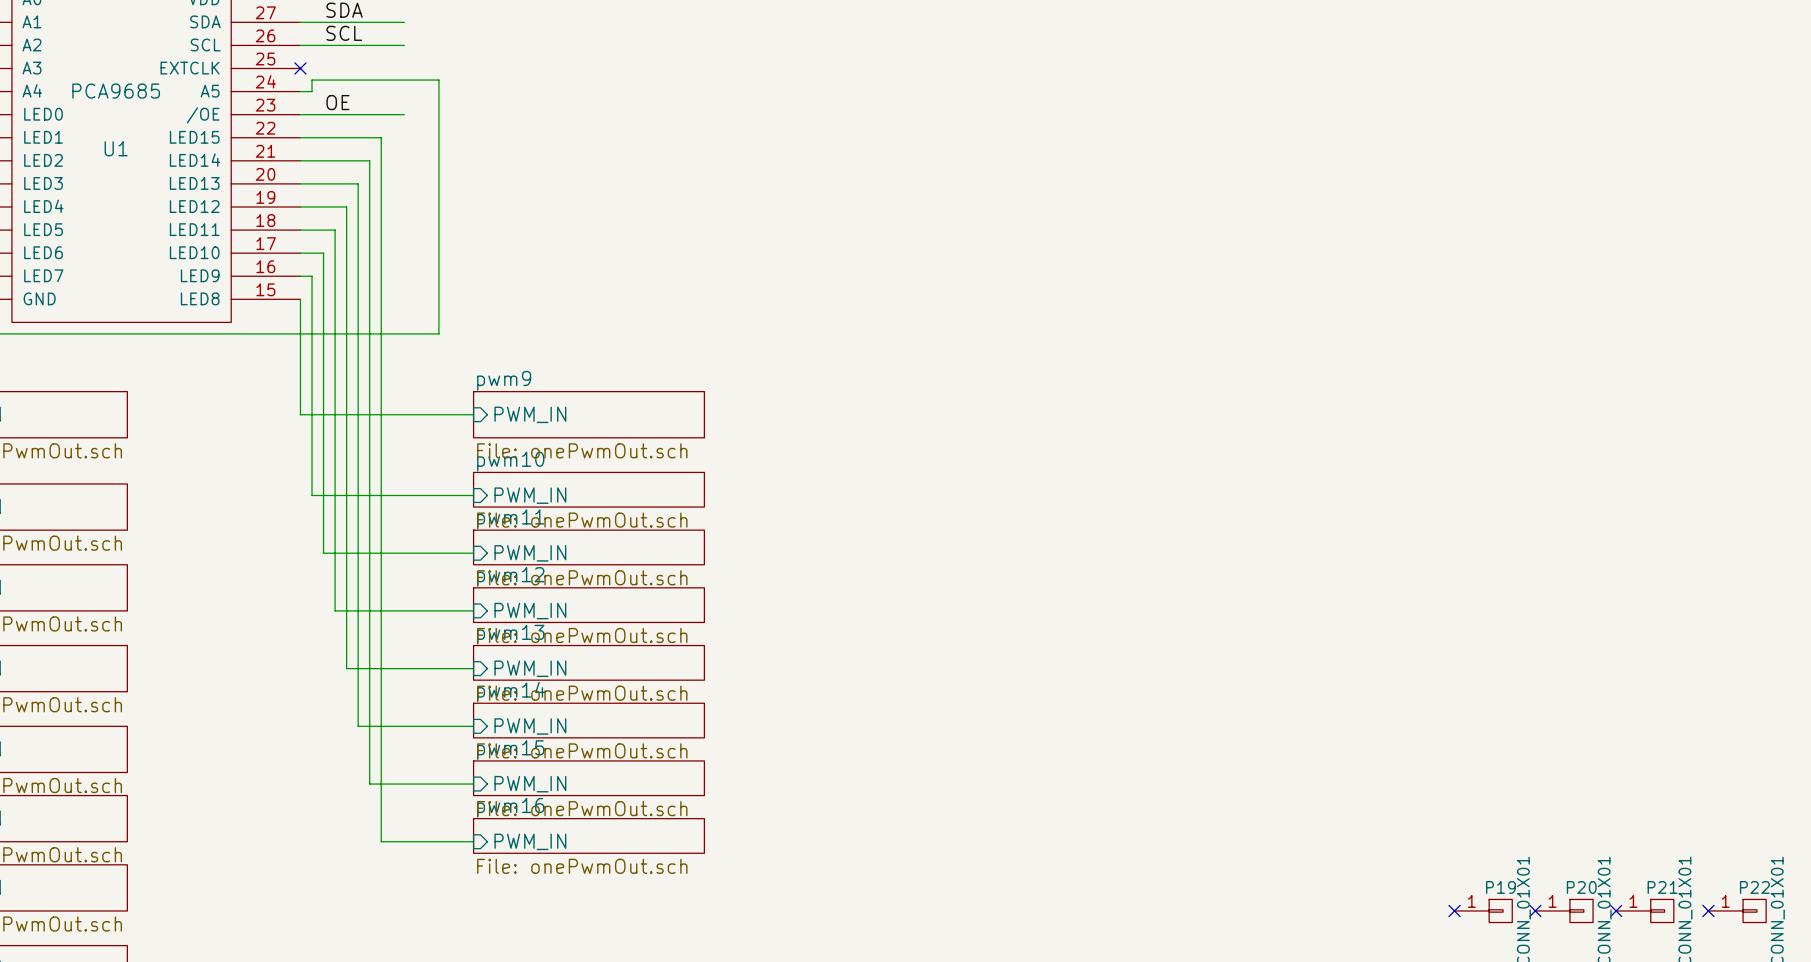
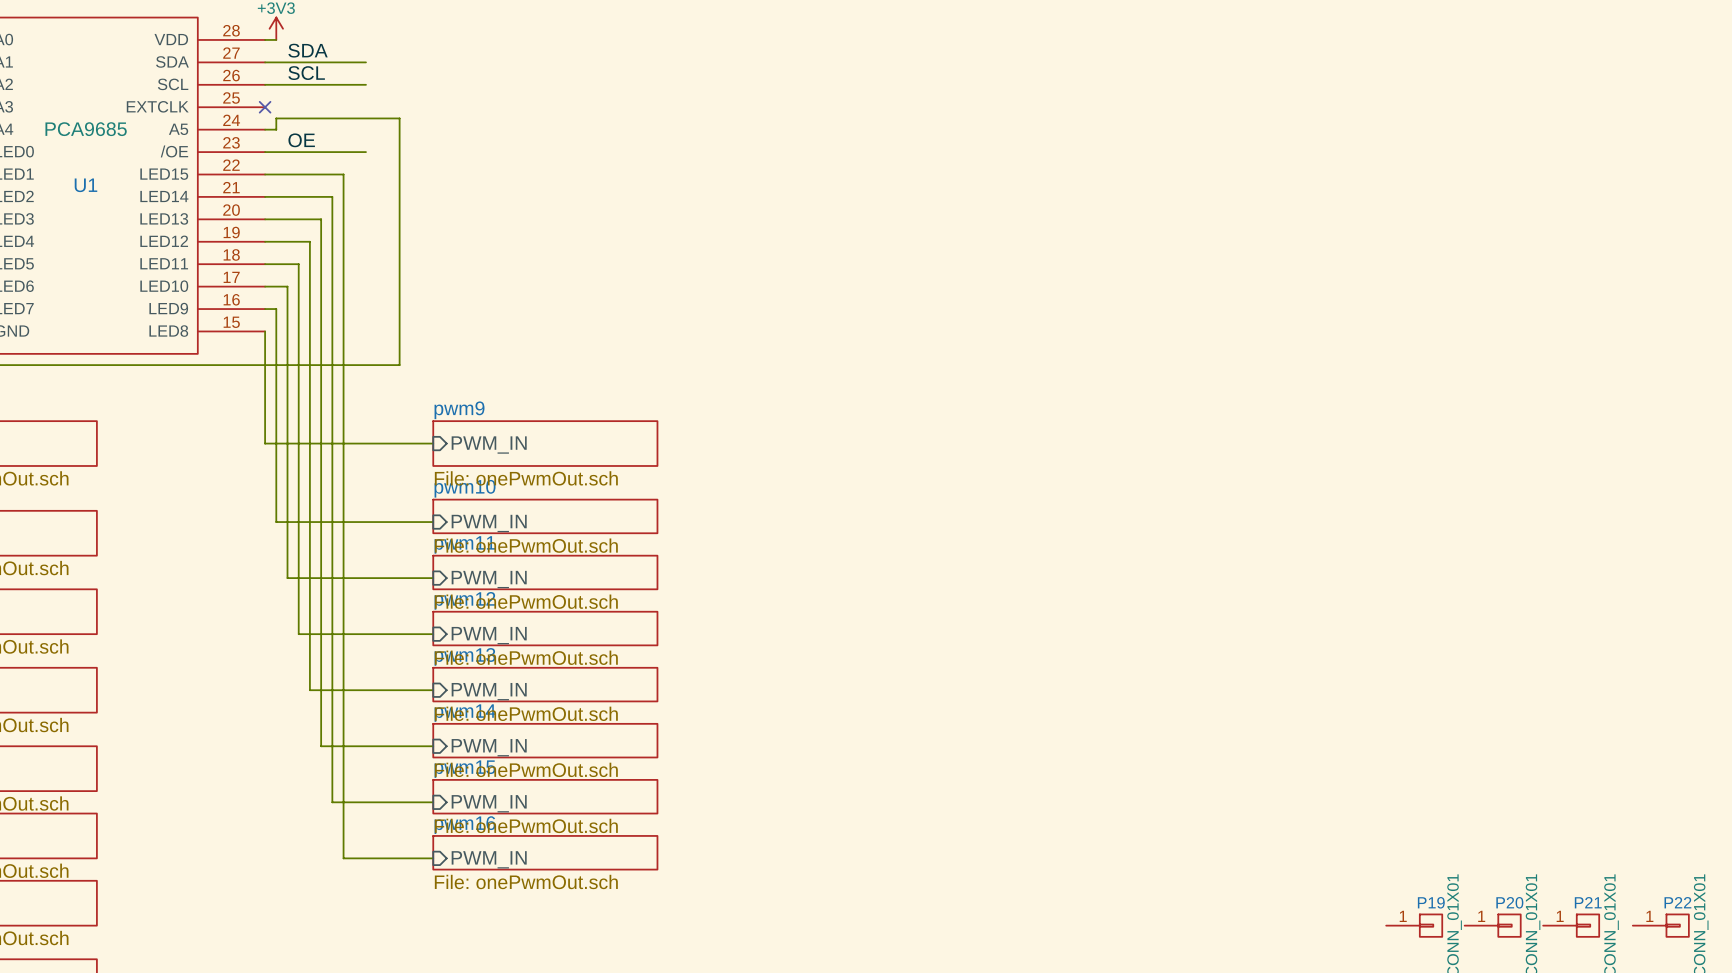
no-connect mark: (1454, 910) -> none
no-connect mark: (1535, 910) -> none
no-connect mark: (1616, 910) -> none
no-connect mark: (1708, 910) -> none

